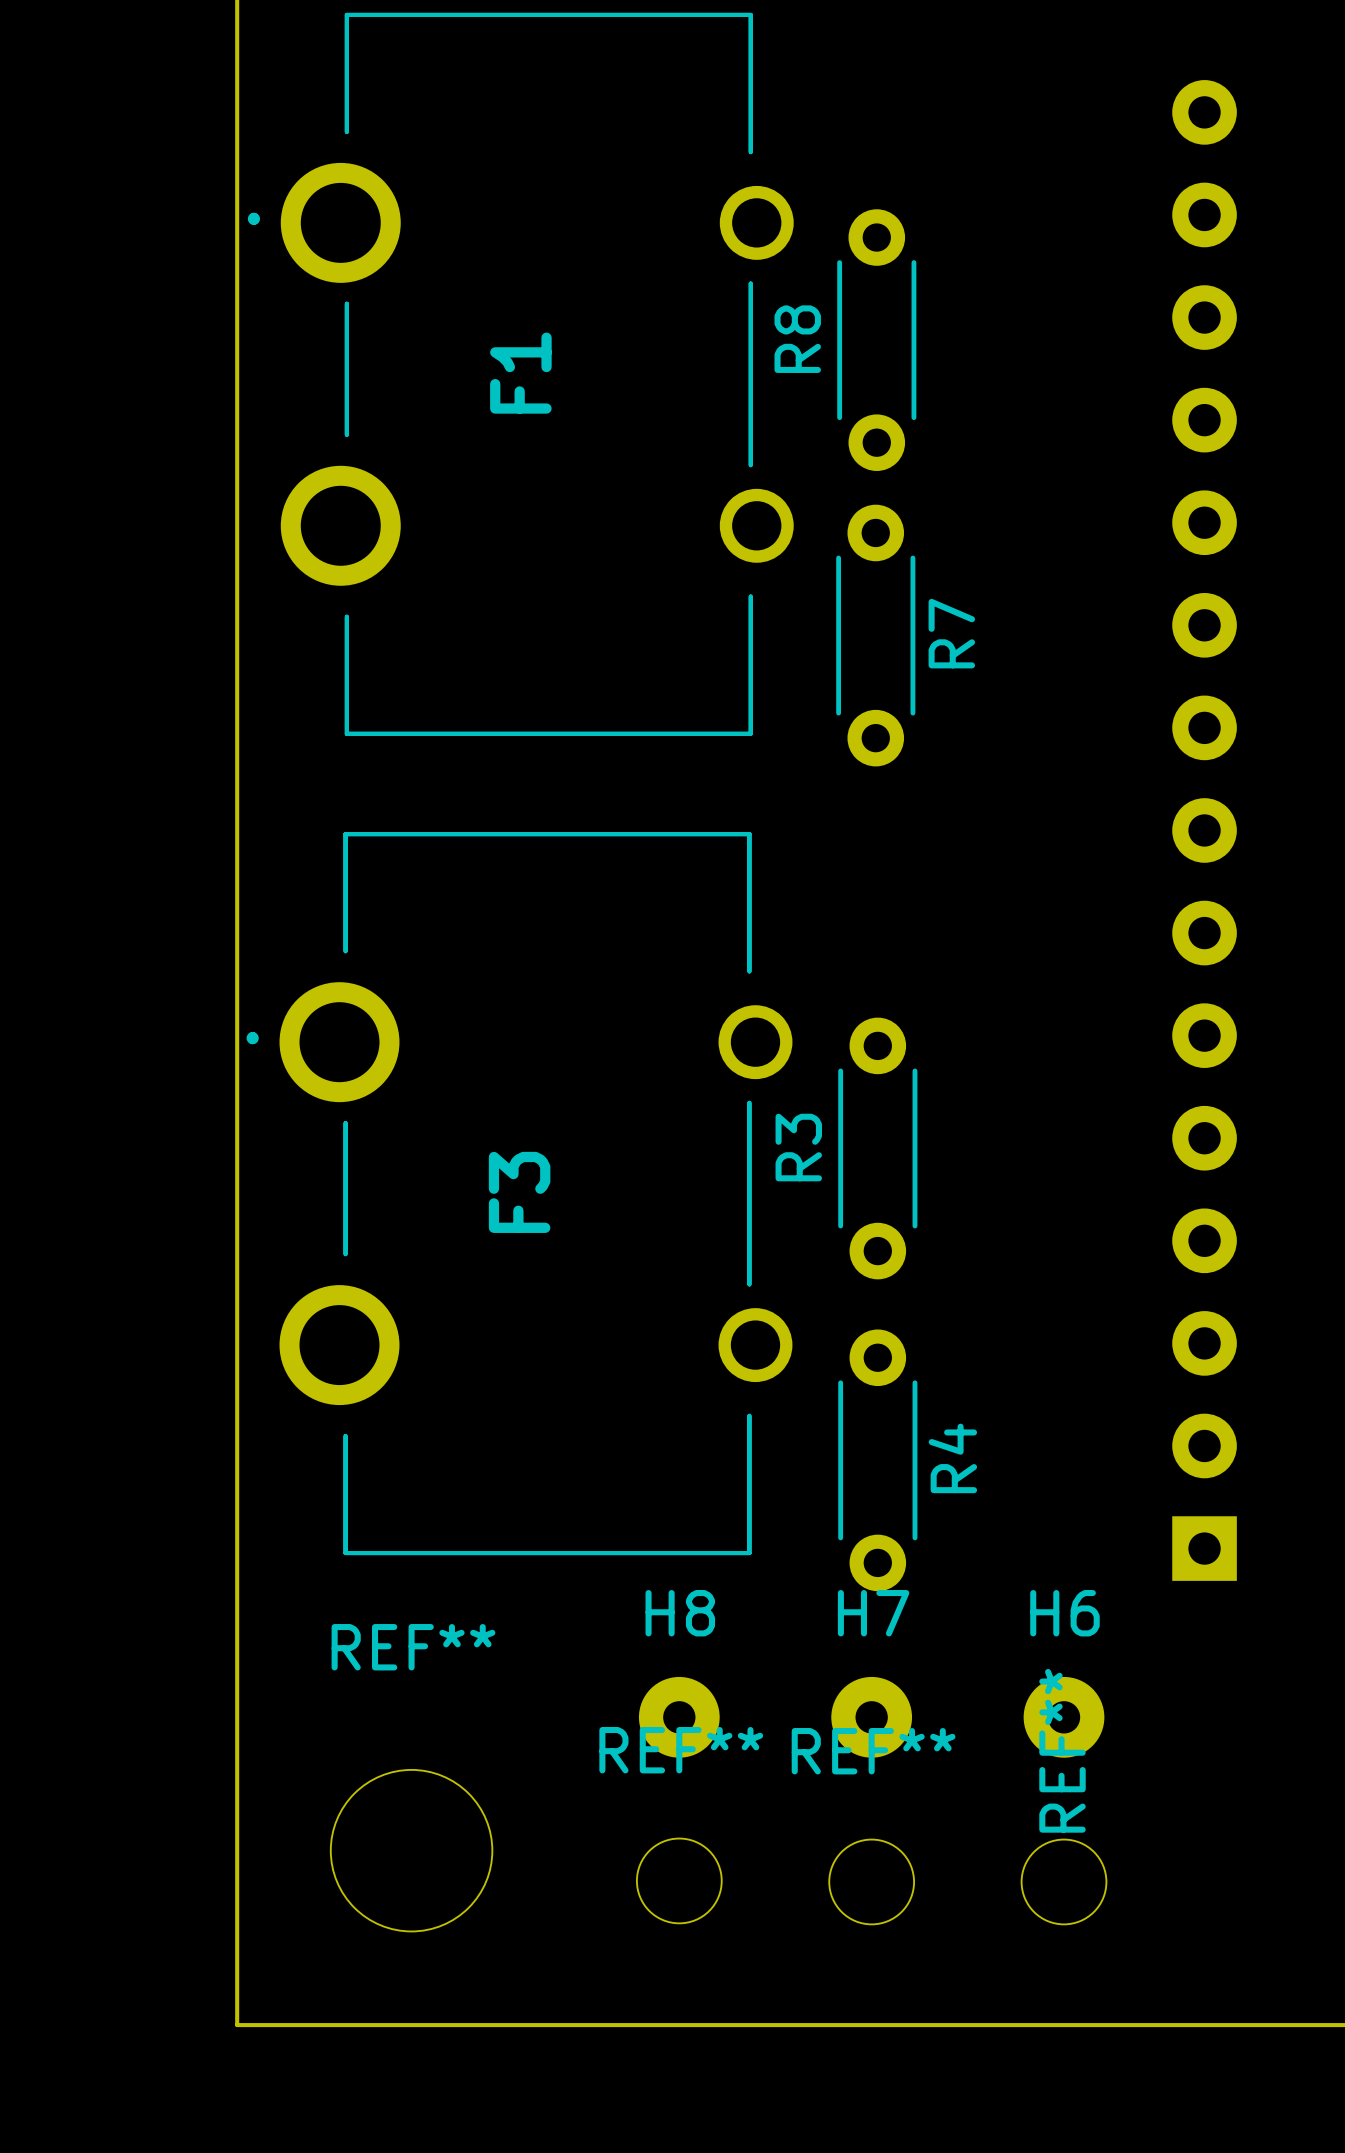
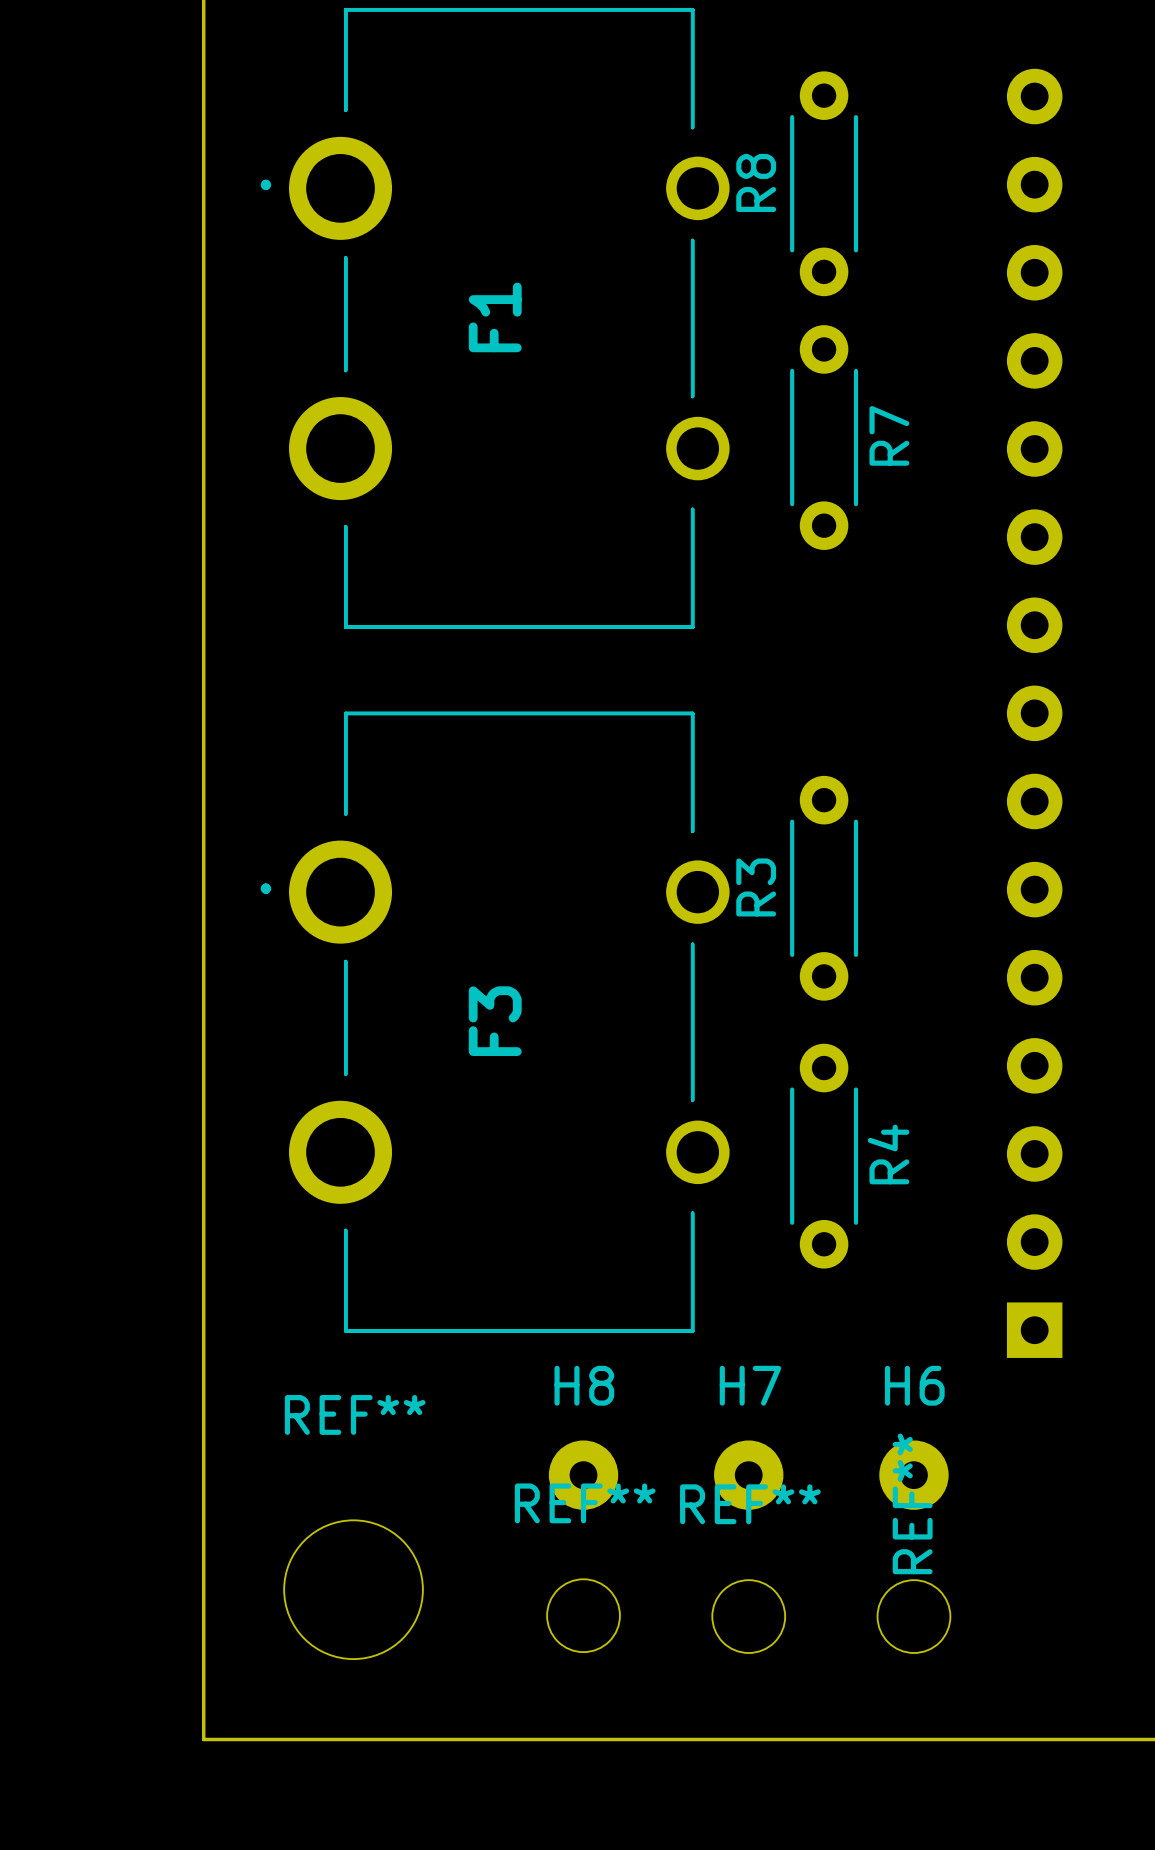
R8 position: (876, 340) -> (824, 183)
F1 position: (520, 374) -> (495, 318)
R7 position: (875, 635) -> (824, 437)
R3 position: (877, 1148) -> (824, 888)
F3 position: (519, 1193) -> (495, 1022)
R4 position: (877, 1460) -> (824, 1156)

